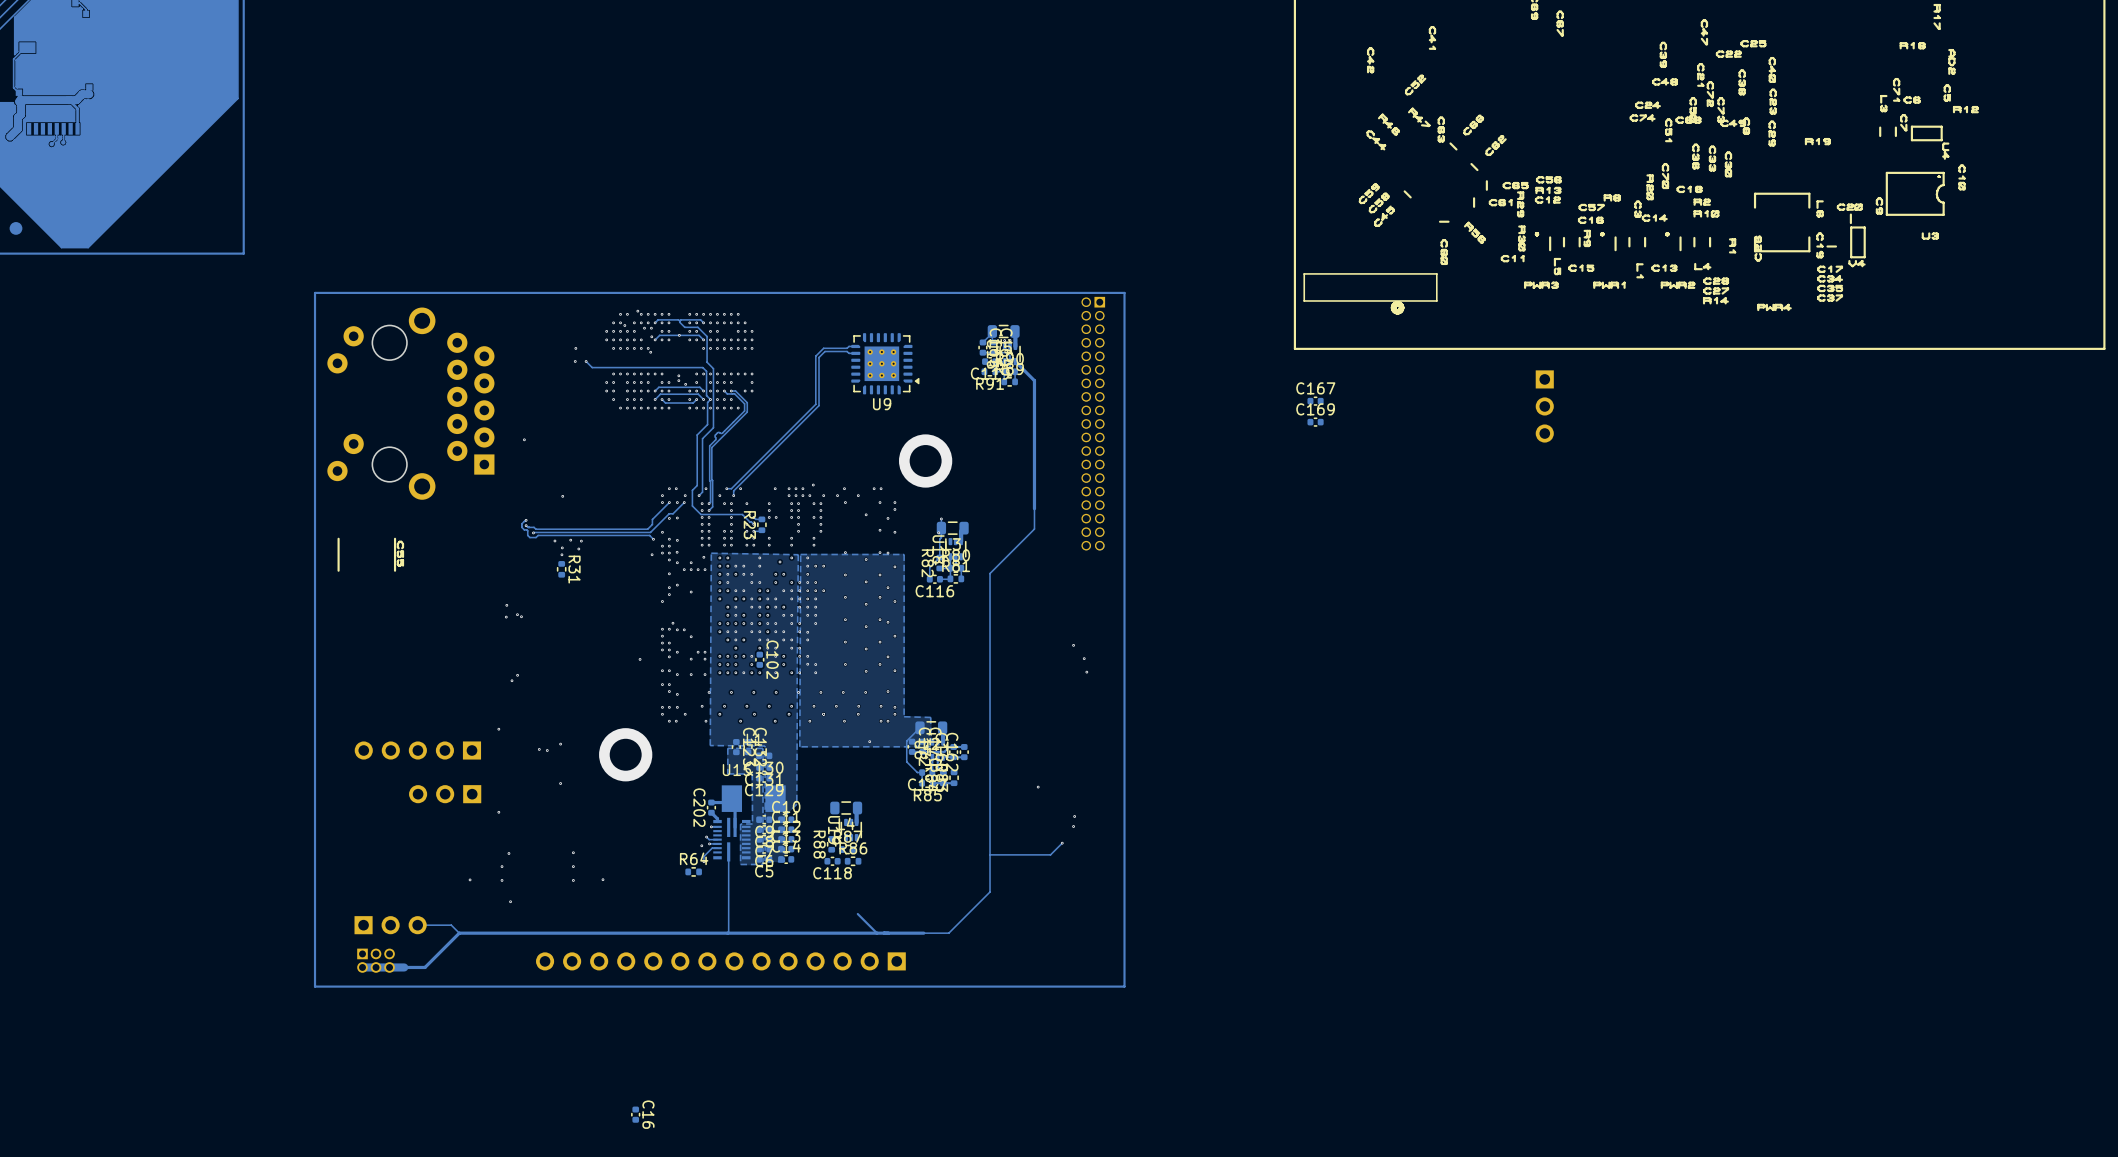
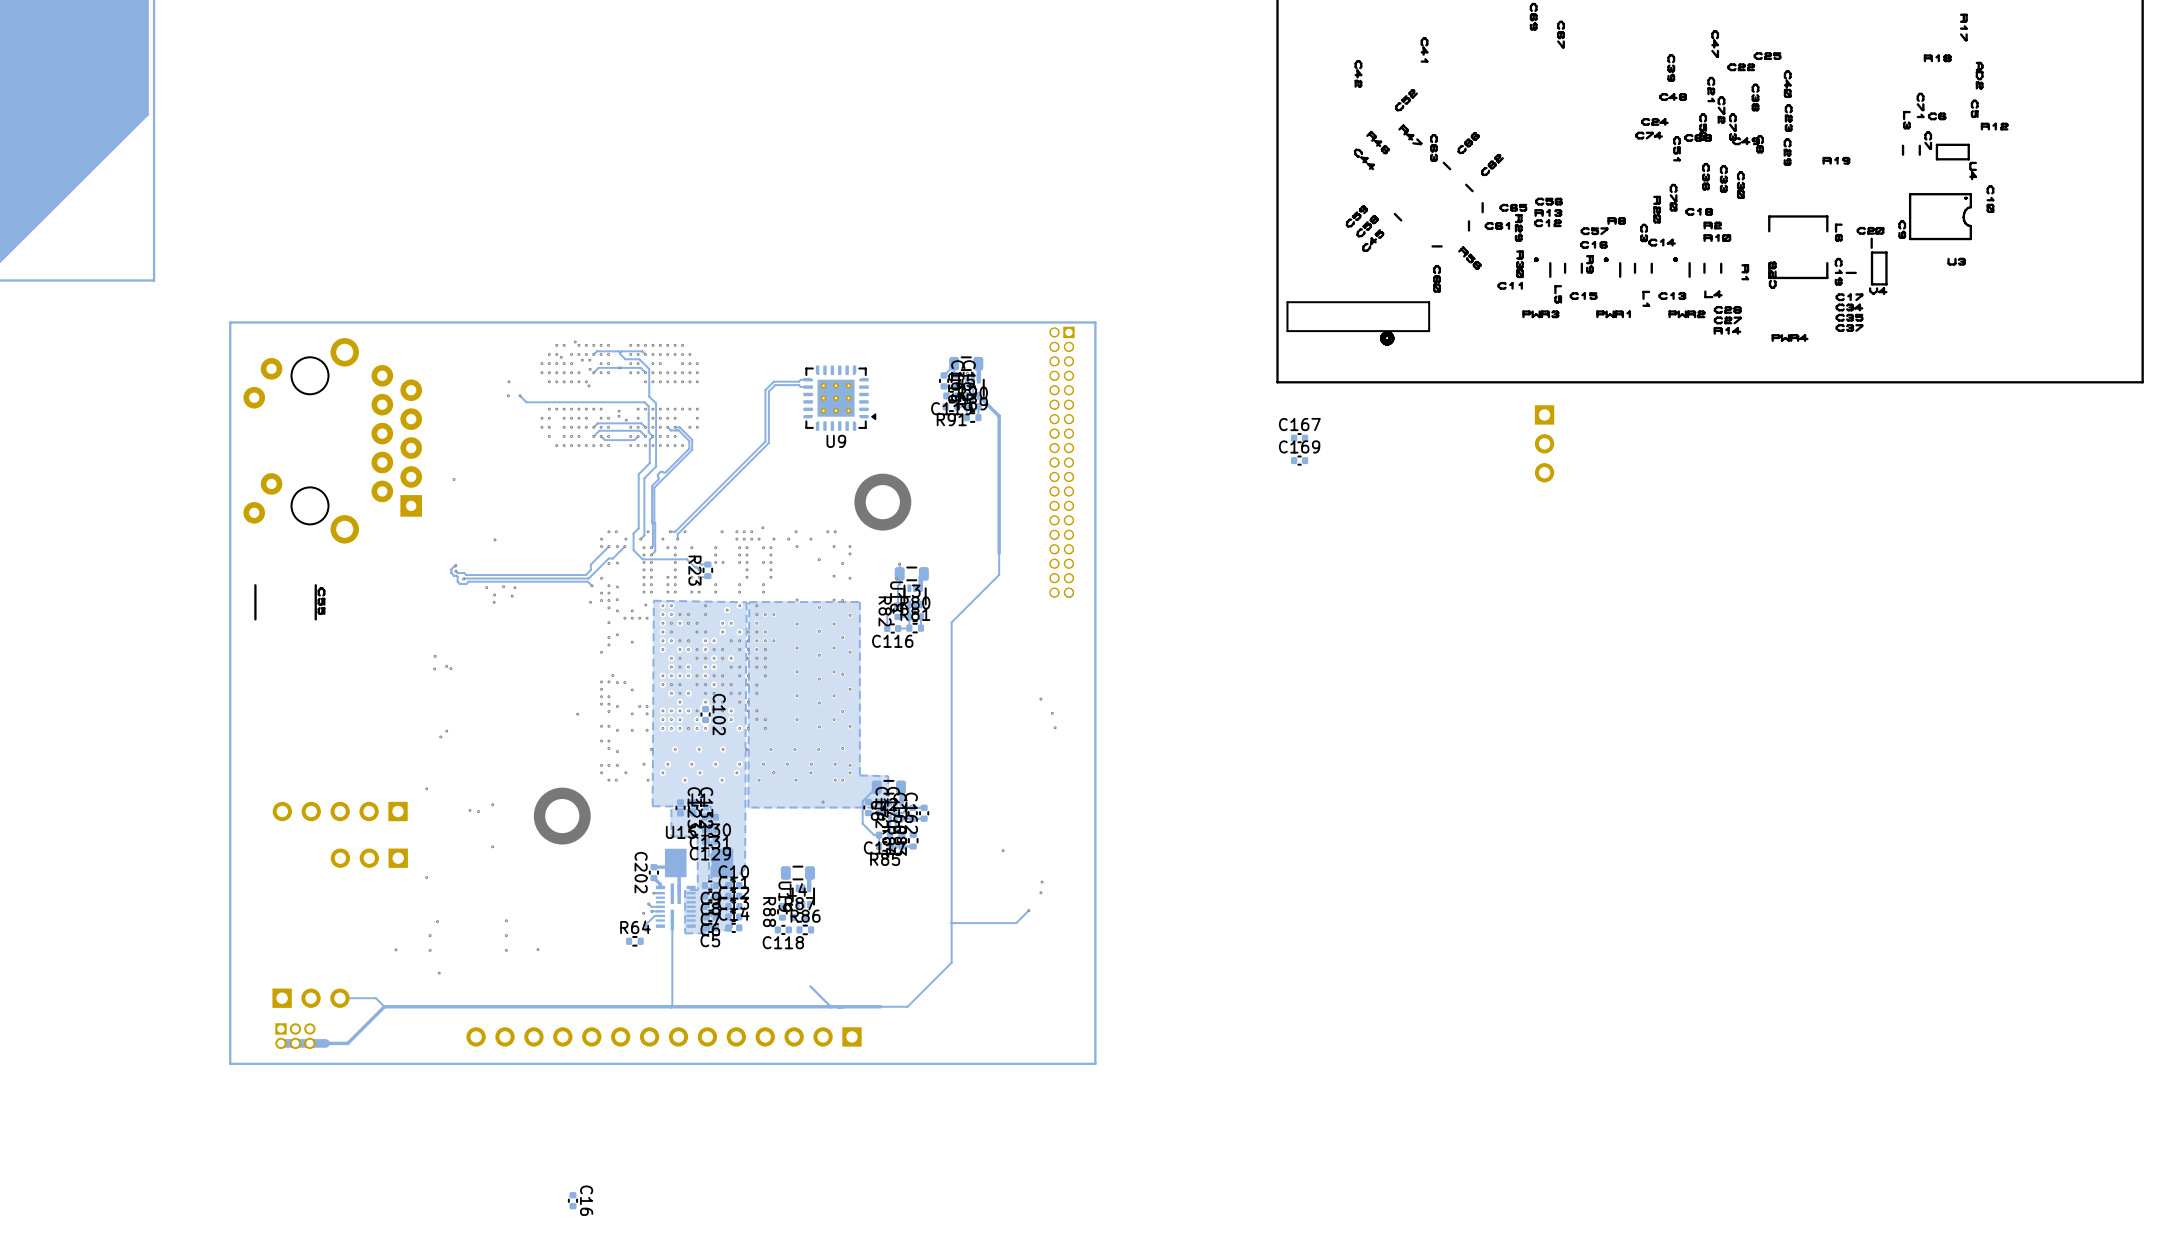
R31: (561, 569) -> none

